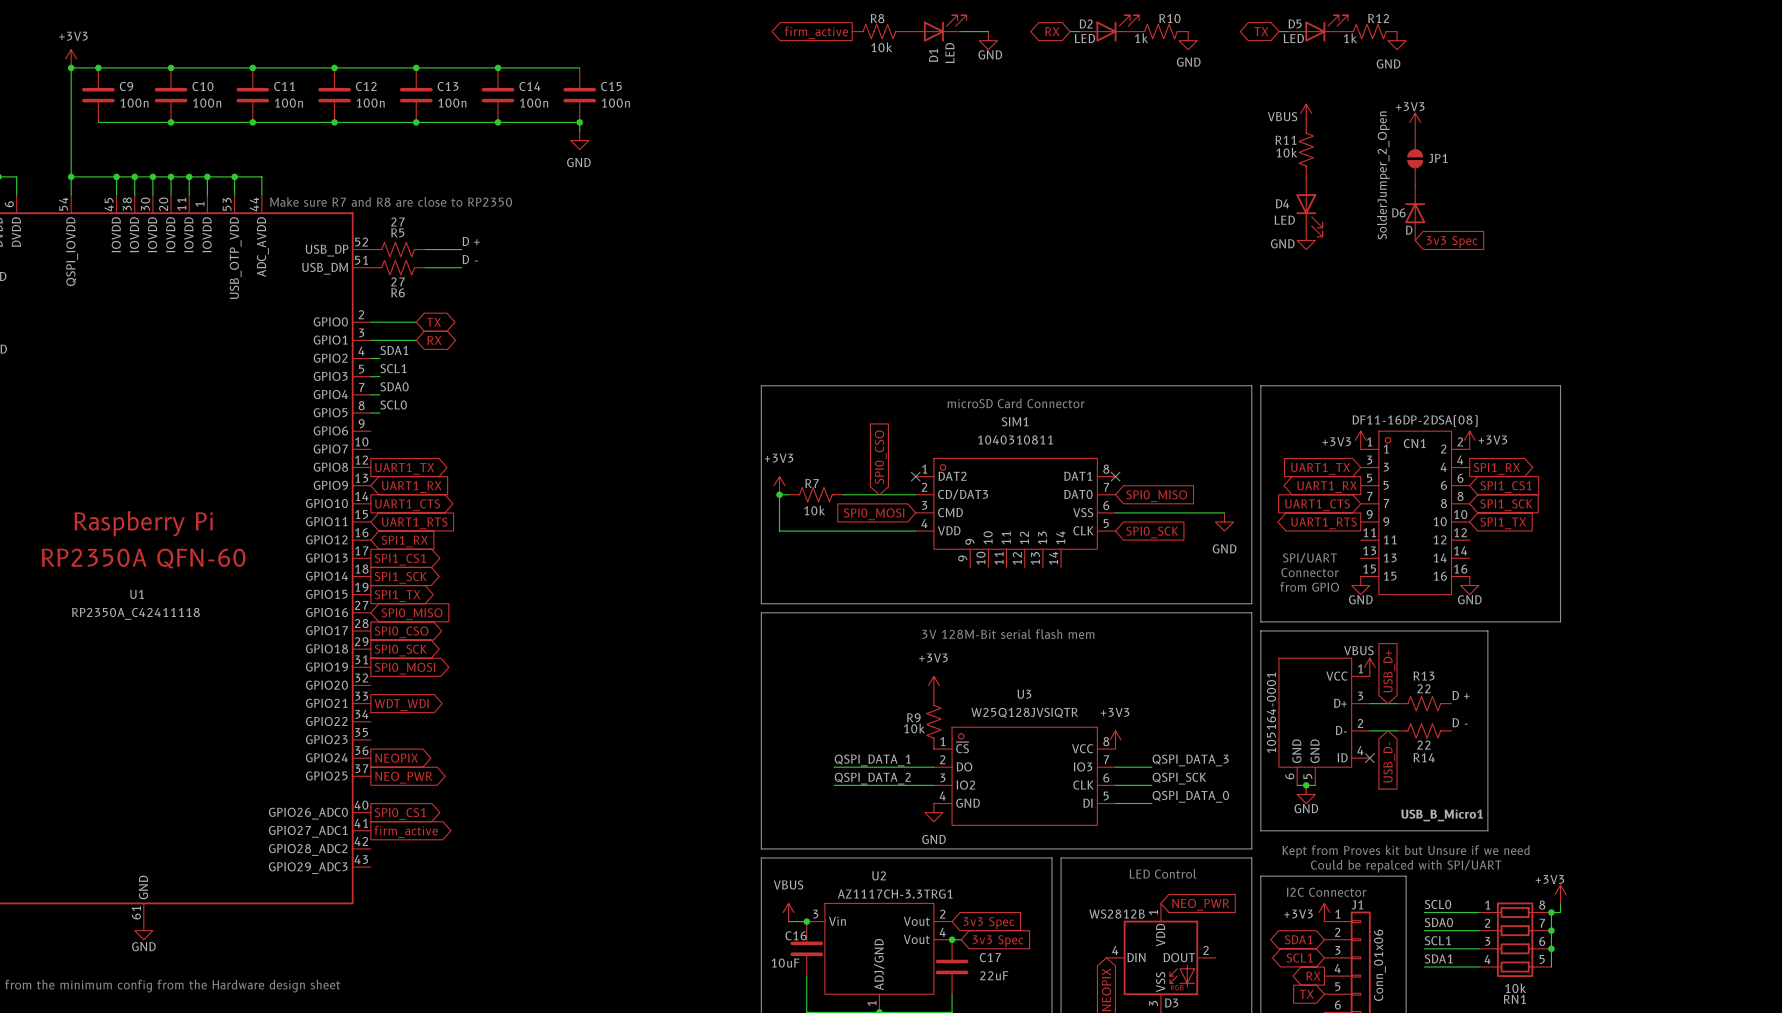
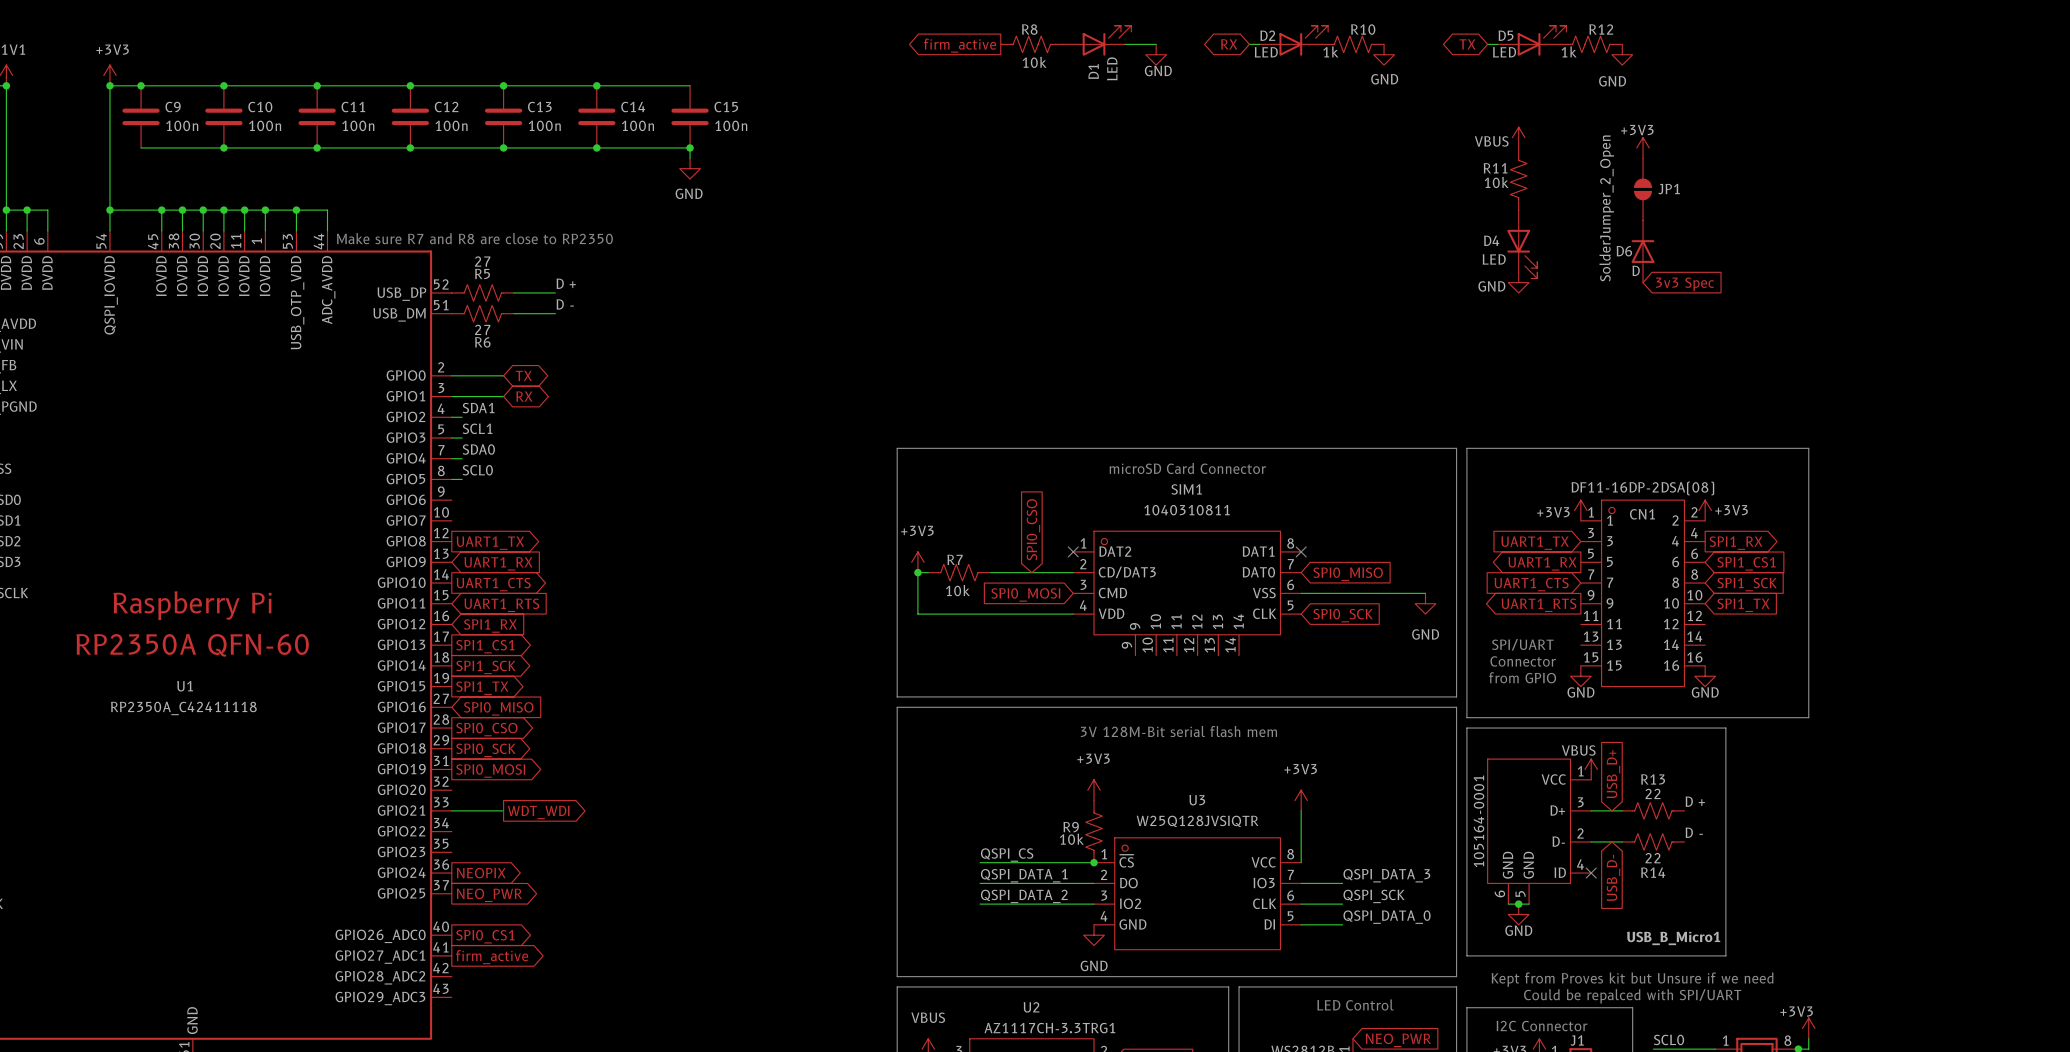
wire: none -> (451, 810) (503, 810)
wire: none -> (1301, 810) (1301, 862)
global label position: WDT_WDI (401, 704) -> WDT_WDI (538, 812)
power symbol position: +3V3 (1115, 739) -> +3V3 (1301, 800)
label: none -> QSPI_CS (1007, 854)
wire: none -> (980, 862) (1094, 862)
junction: none -> (1094, 862)

